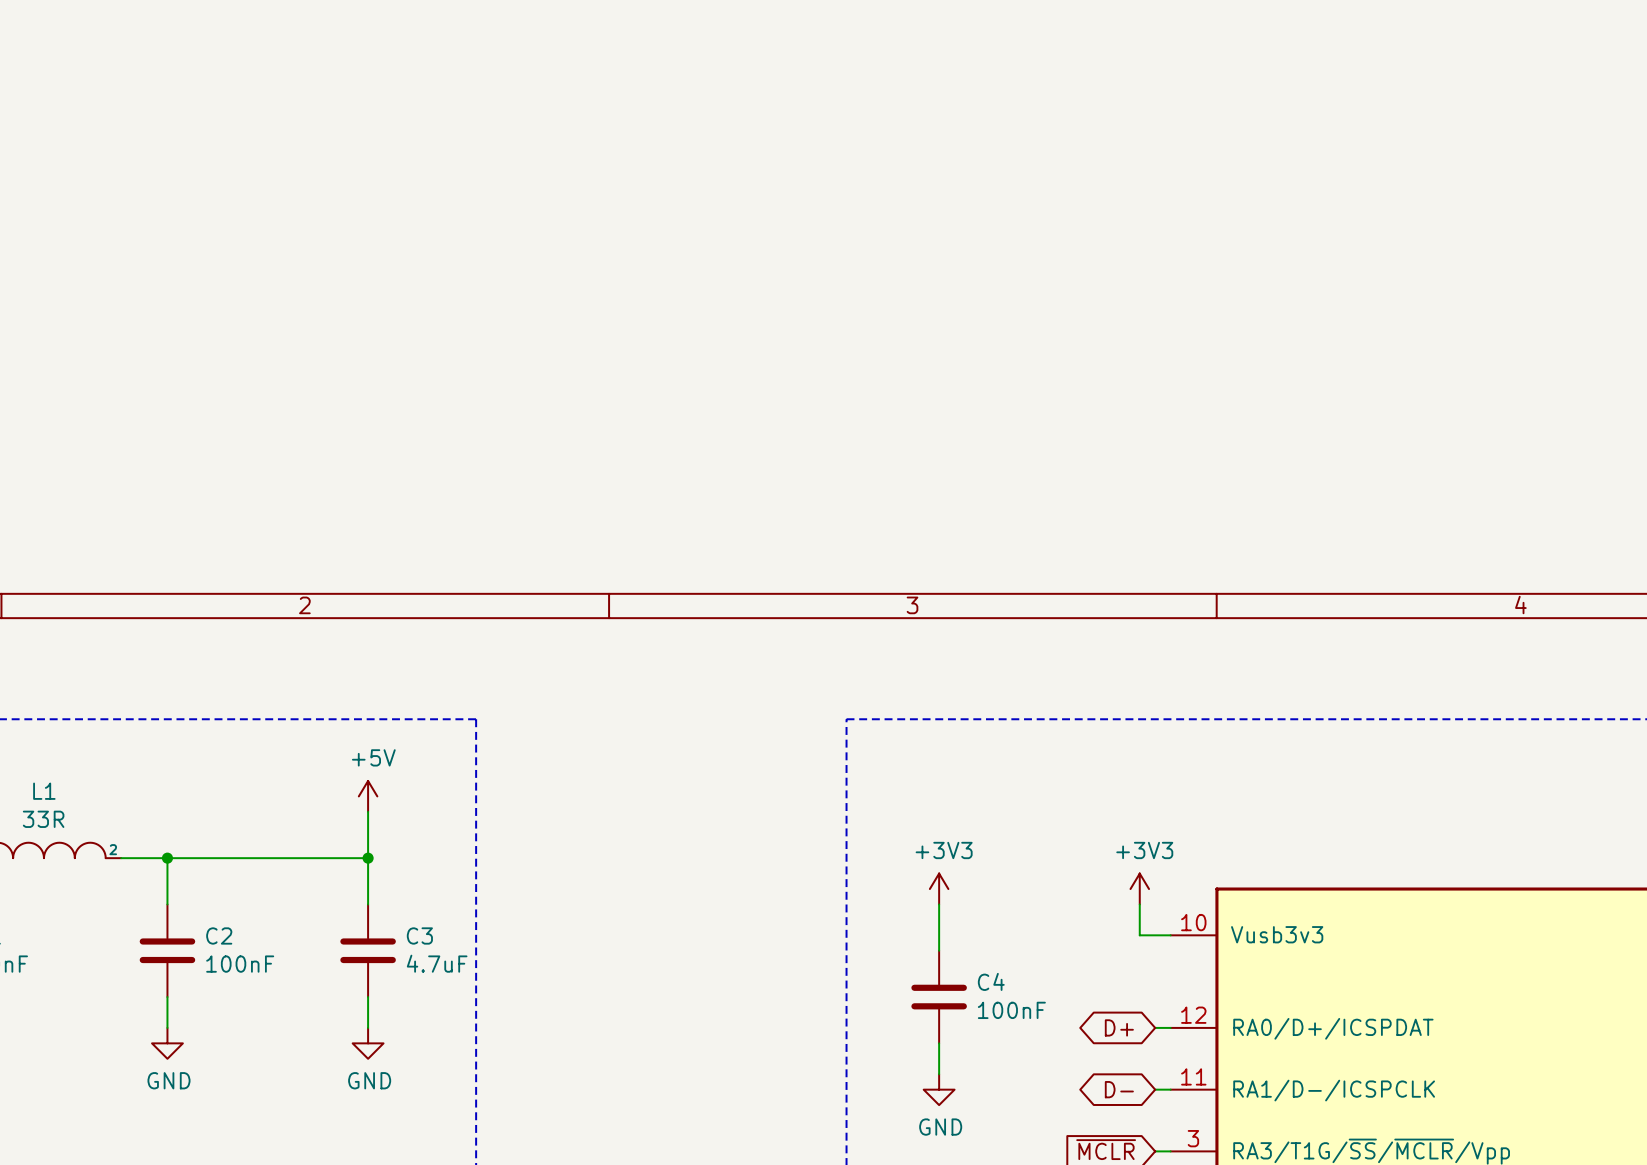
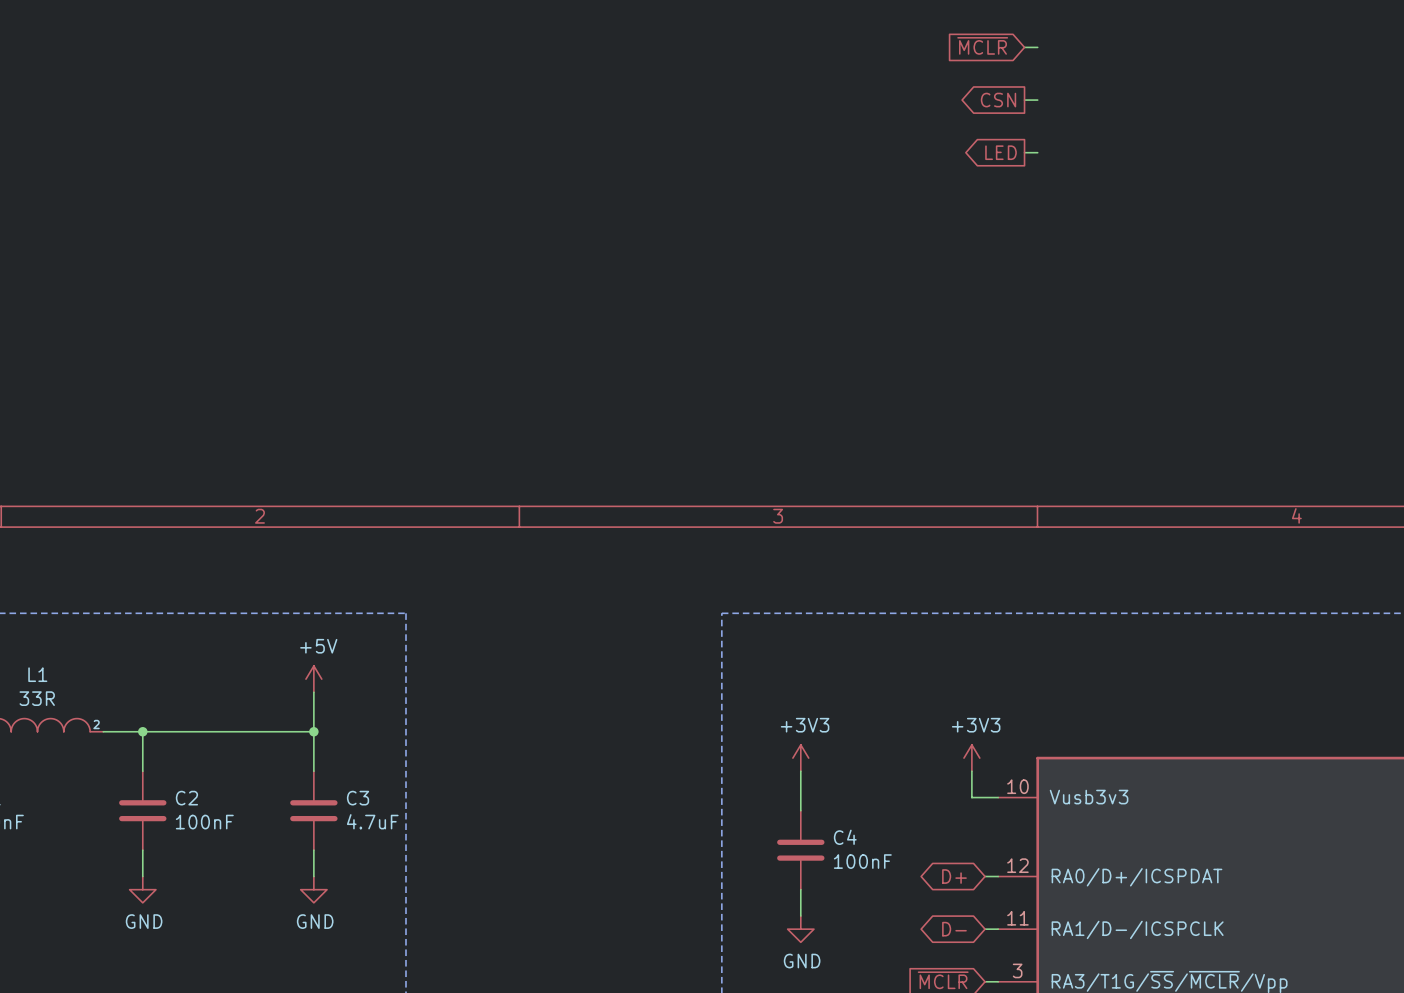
global label: none -> ~{MCLR} (982, 45)
wire: none -> (1024, 47) (1037, 47)
global label: none -> CSN (998, 100)
wire: none -> (1024, 100) (1037, 100)
global label: none -> LED (1001, 152)
wire: none -> (1024, 152) (1037, 152)

